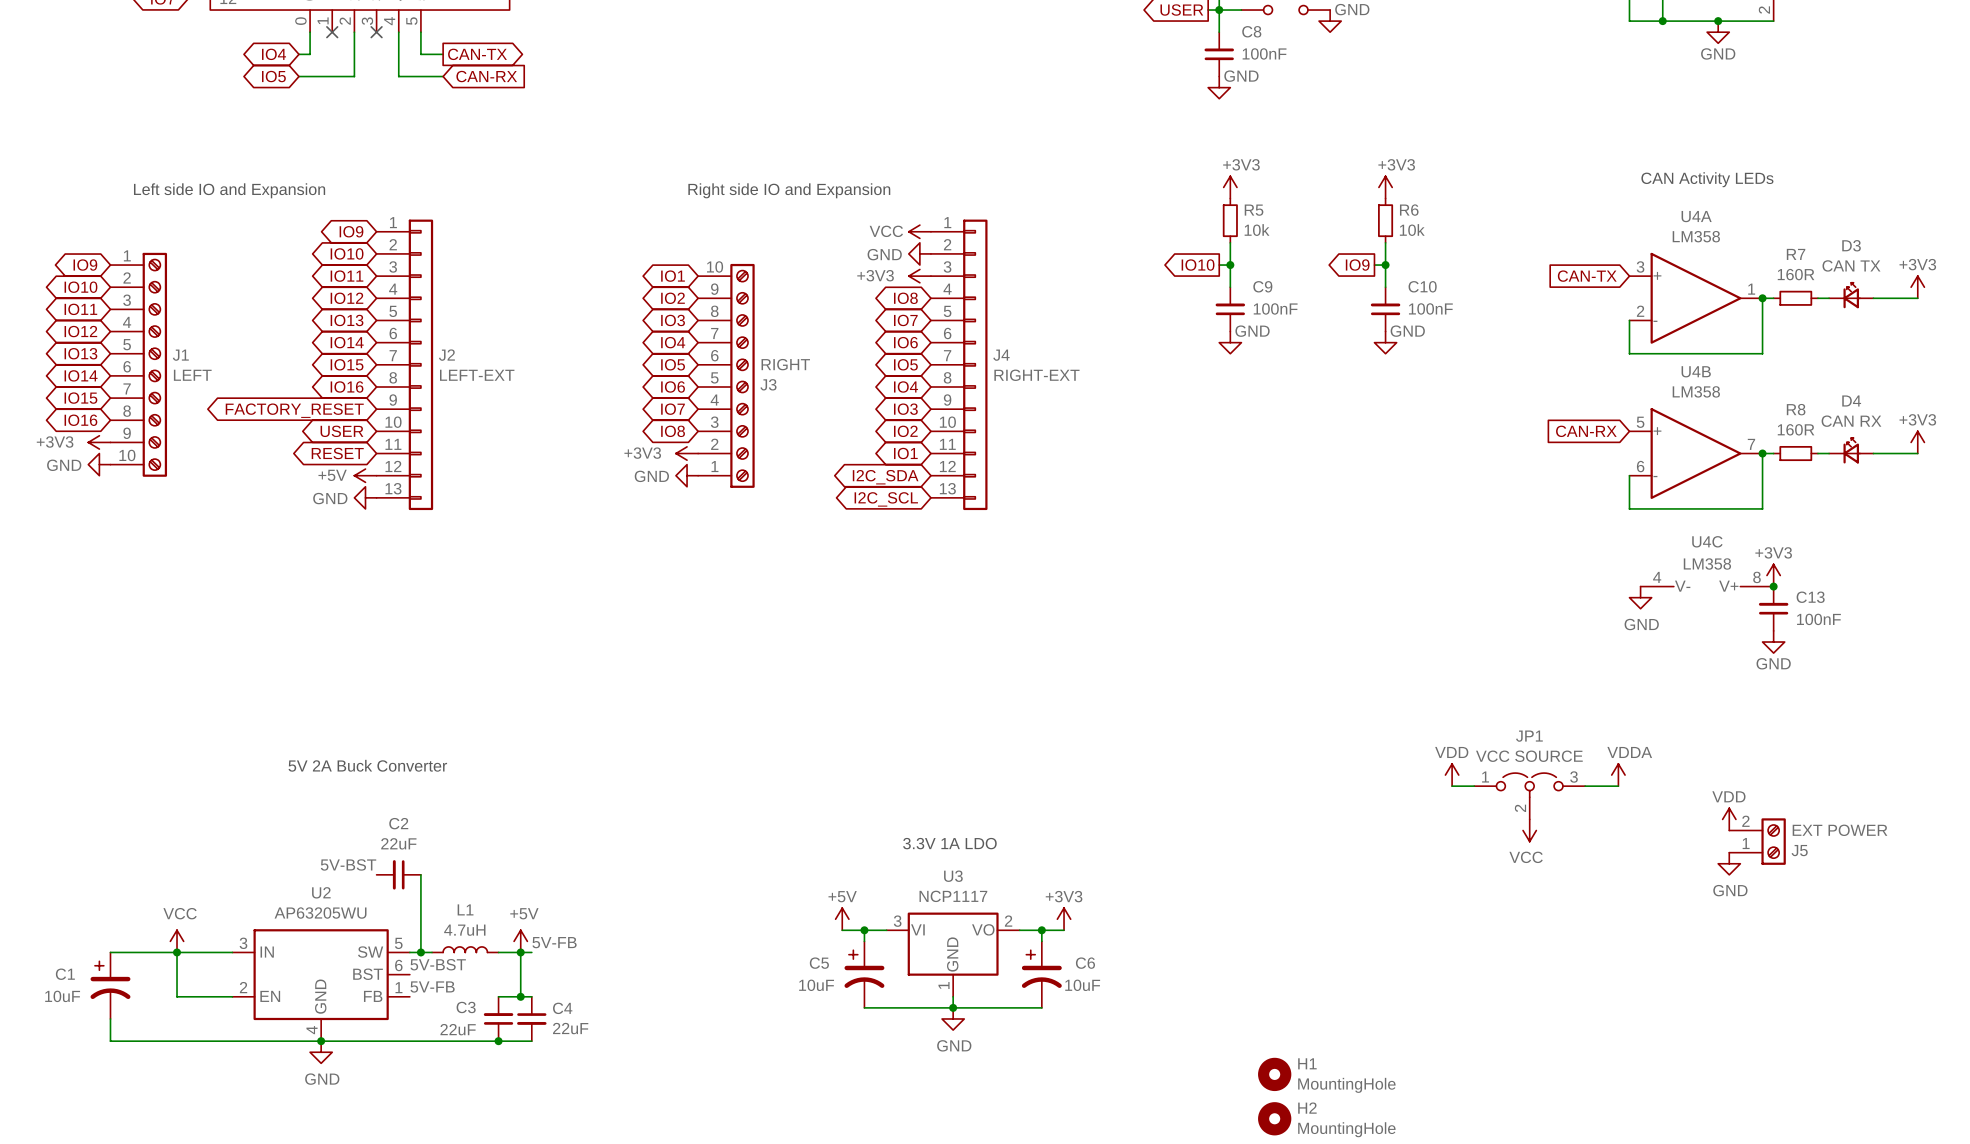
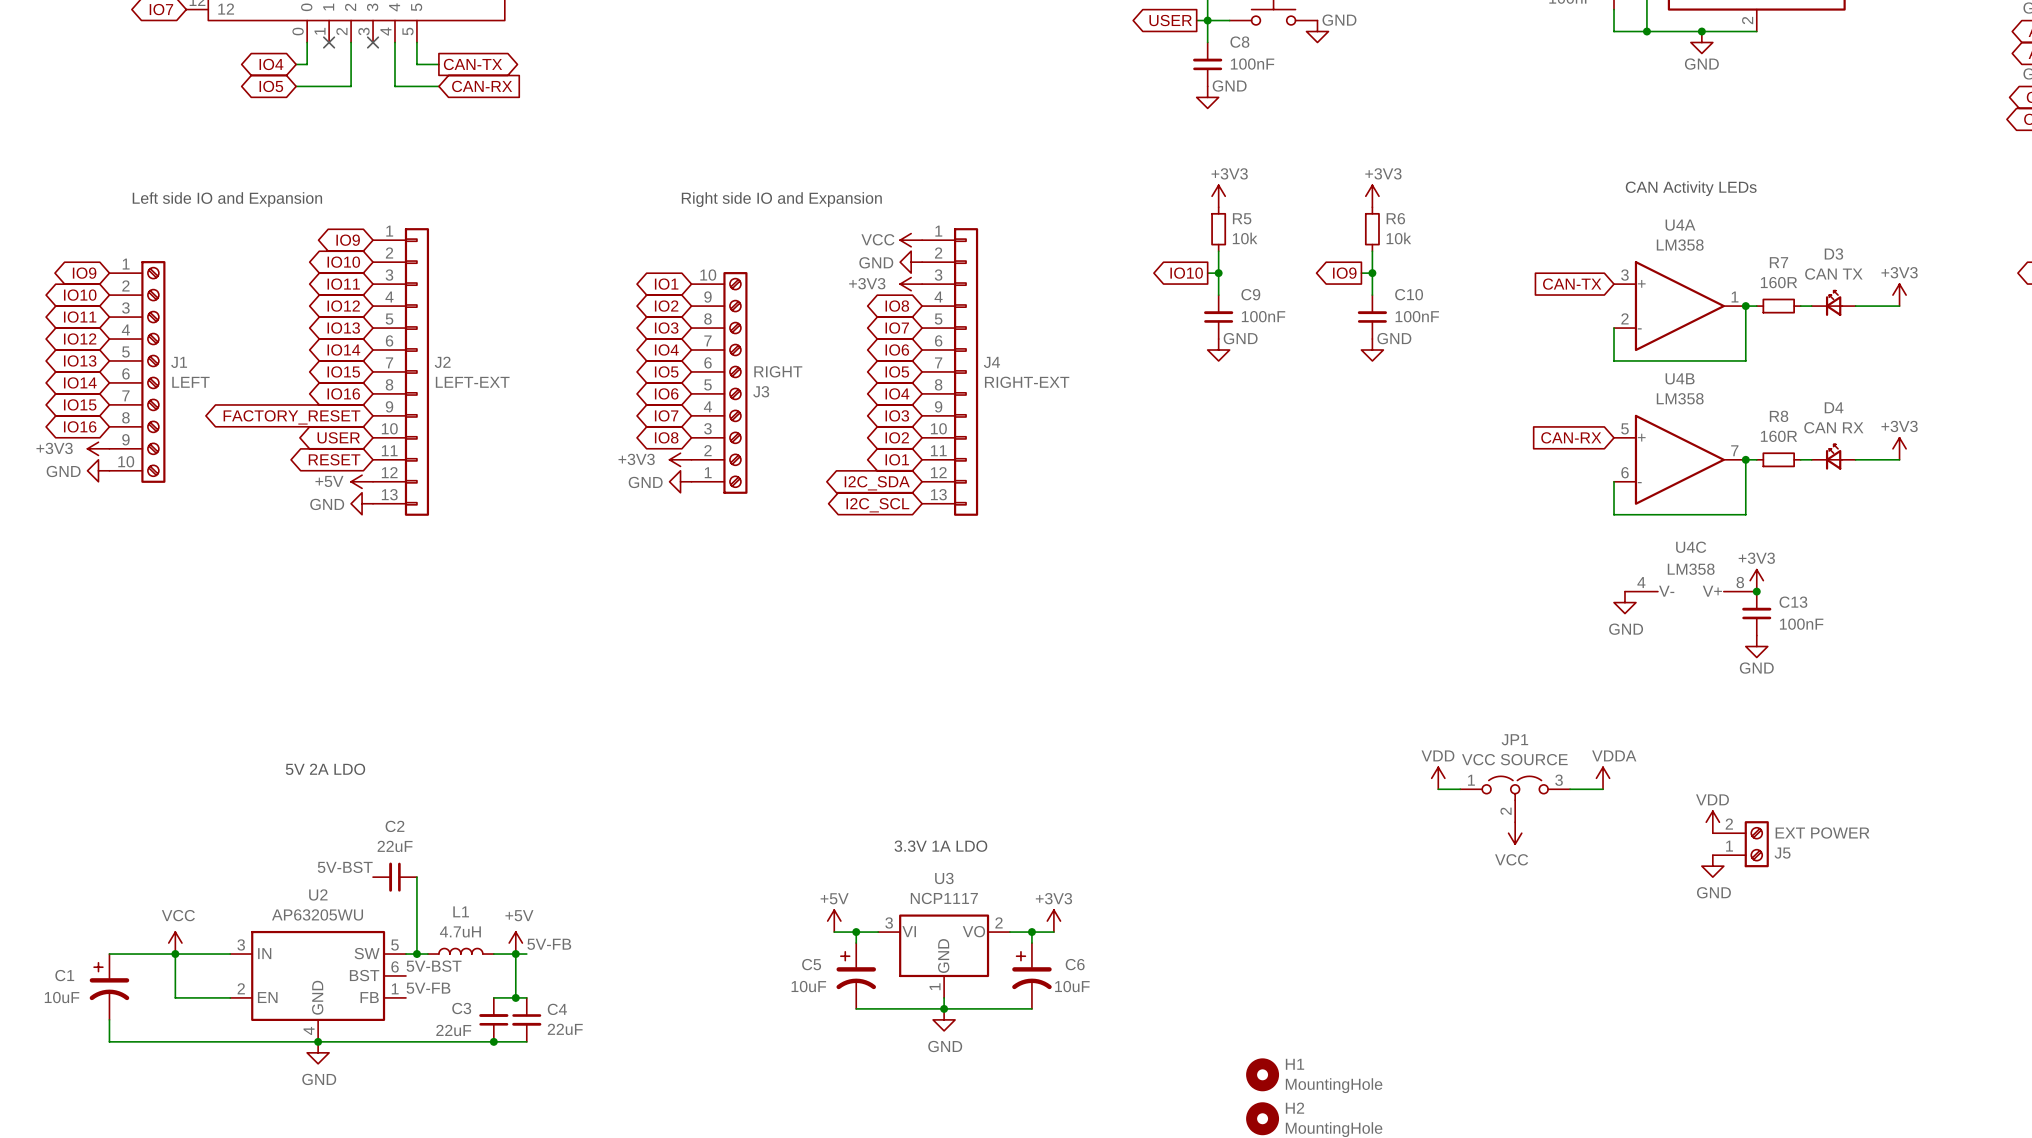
text: 5V 2A Buck Converter (367, 765) -> 5V 2A LDO (325, 769)

